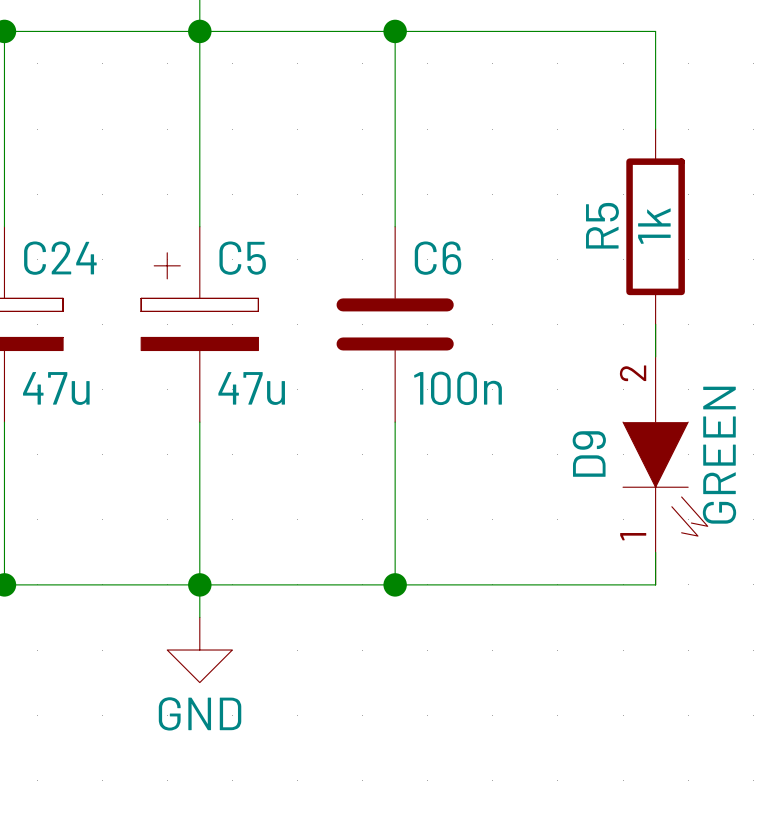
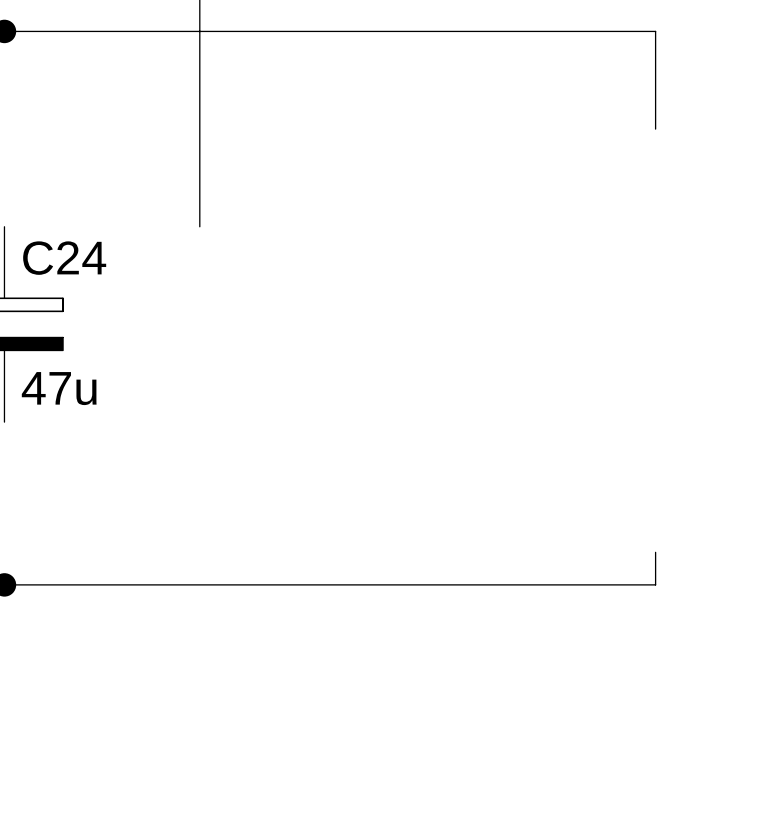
wire: (4, 31) (4, 226) -> none
junction: (199, 31) -> none
wire: (395, 31) (395, 226) -> none
junction: (395, 31) -> none
R5: 1k (655, 226) -> none
C5: 47u (199, 324) -> none
C6: 100n (395, 324) -> none
wire: (655, 324) (655, 357) -> none
wire: (4, 422) (4, 584) -> none
wire: (199, 422) (199, 617) -> none
wire: (395, 422) (395, 584) -> none
D9: GREEN (665, 454) -> none
junction: (199, 584) -> none
junction: (395, 584) -> none
power symbol: GND (199, 650) -> none

